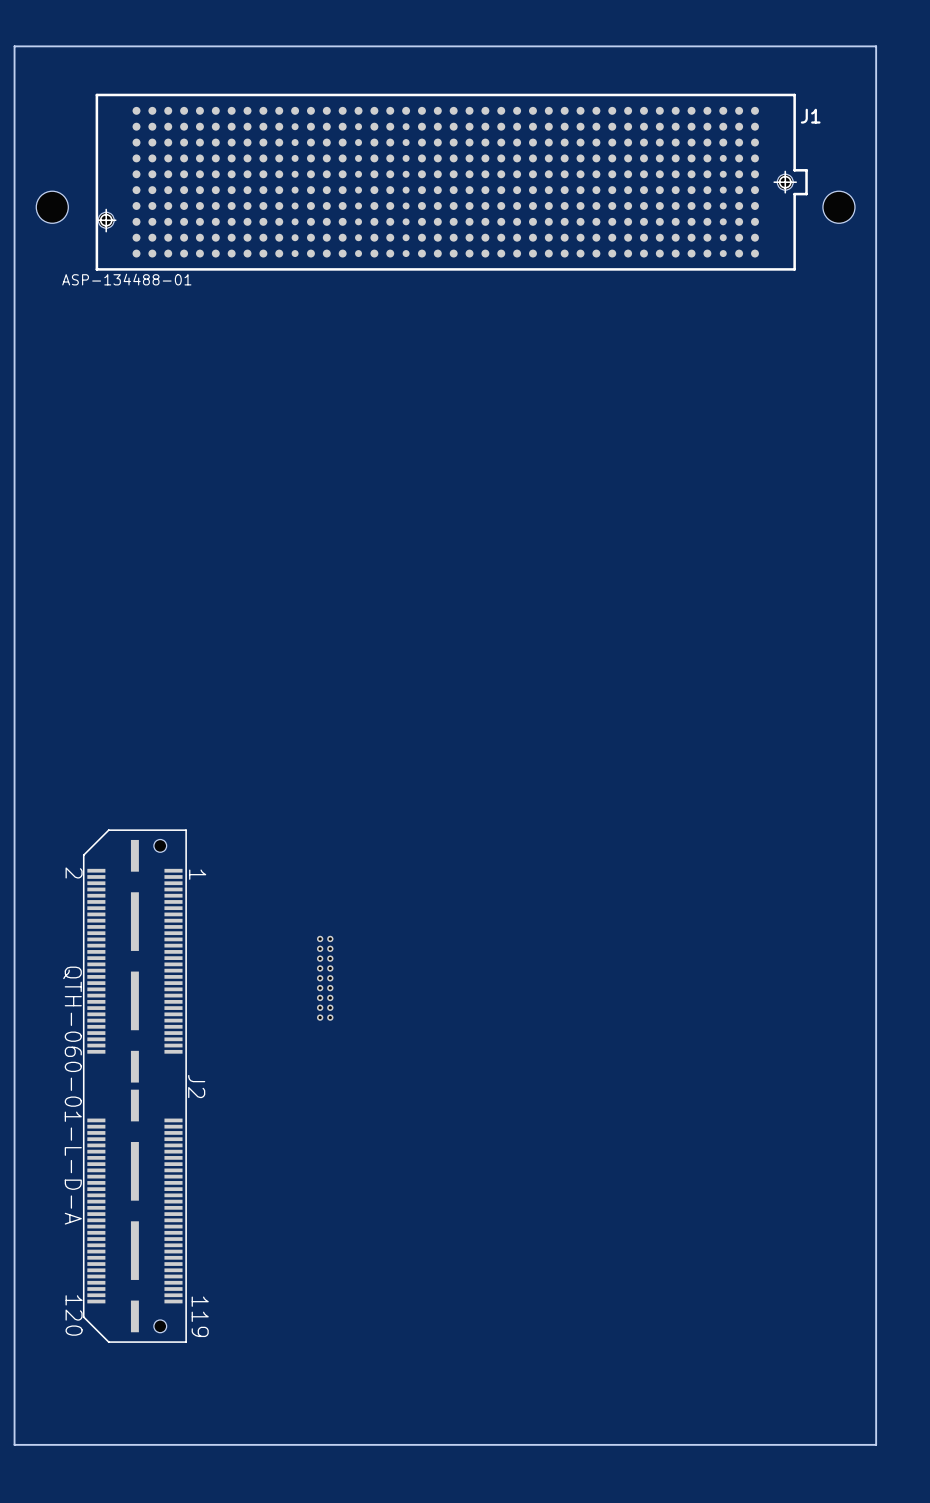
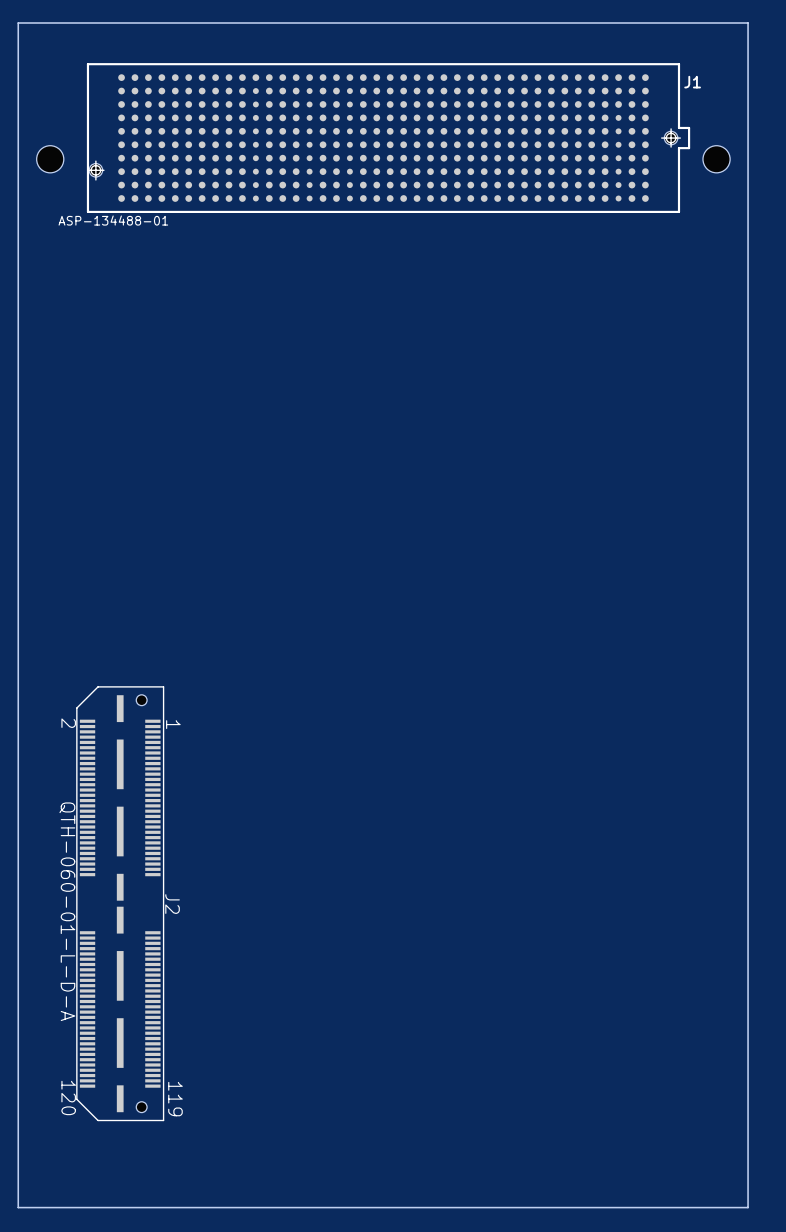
part: (325, 978) -> none

